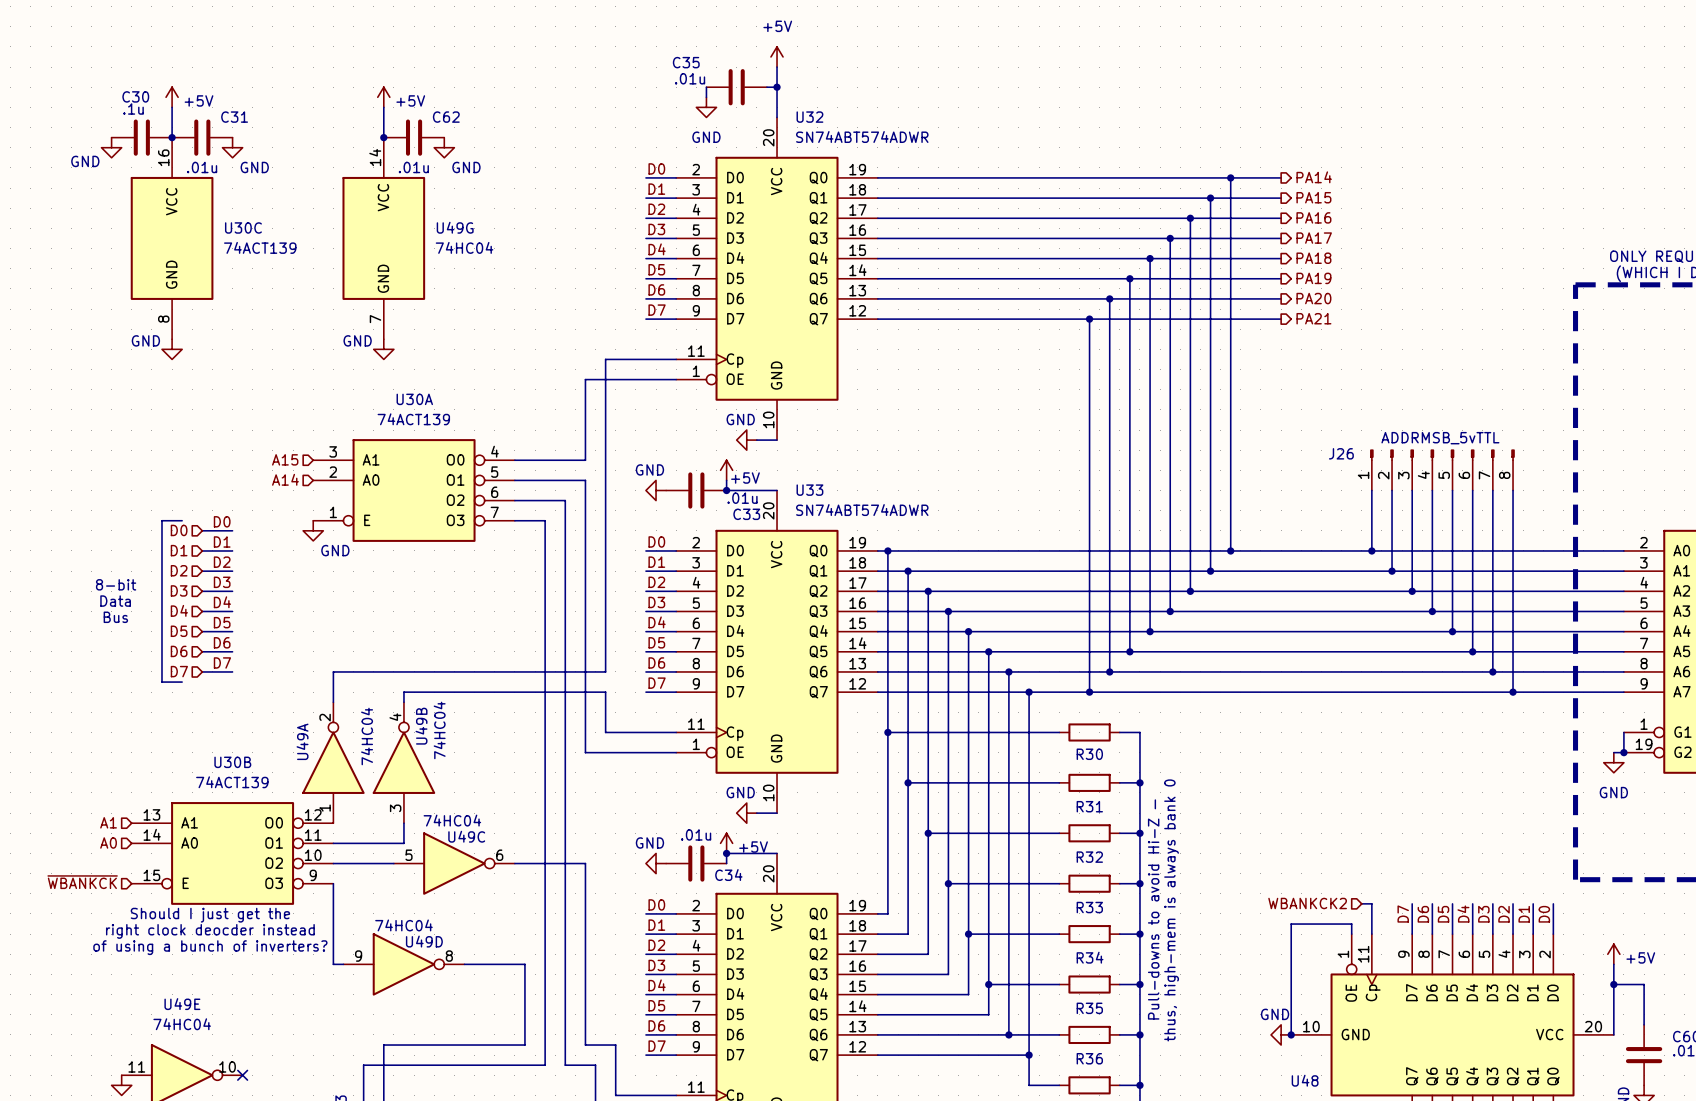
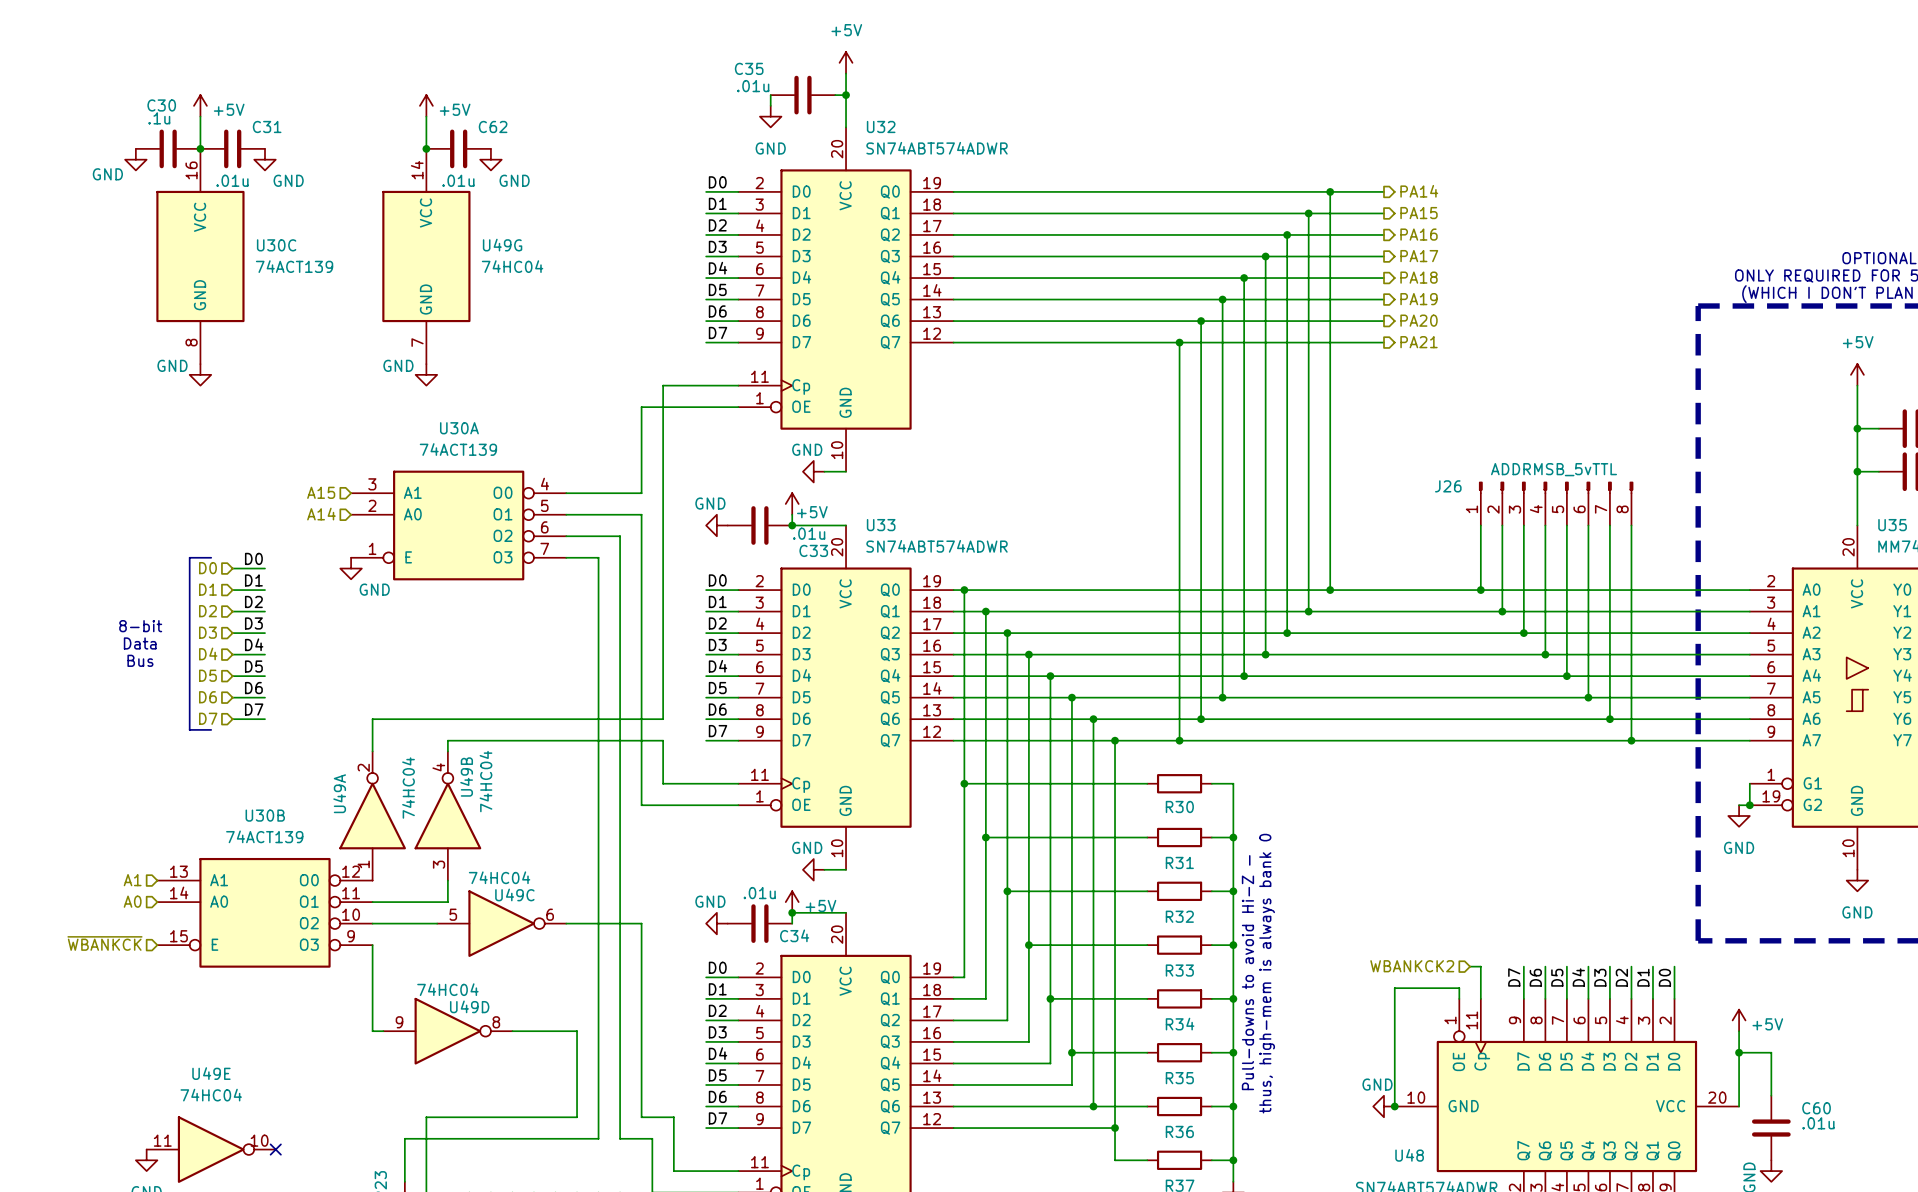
text: Should I just get the (210, 915) -> none
text: right clock deocder instead (210, 931) -> none
text: of using a bunch of inverters? (210, 947) -> none

